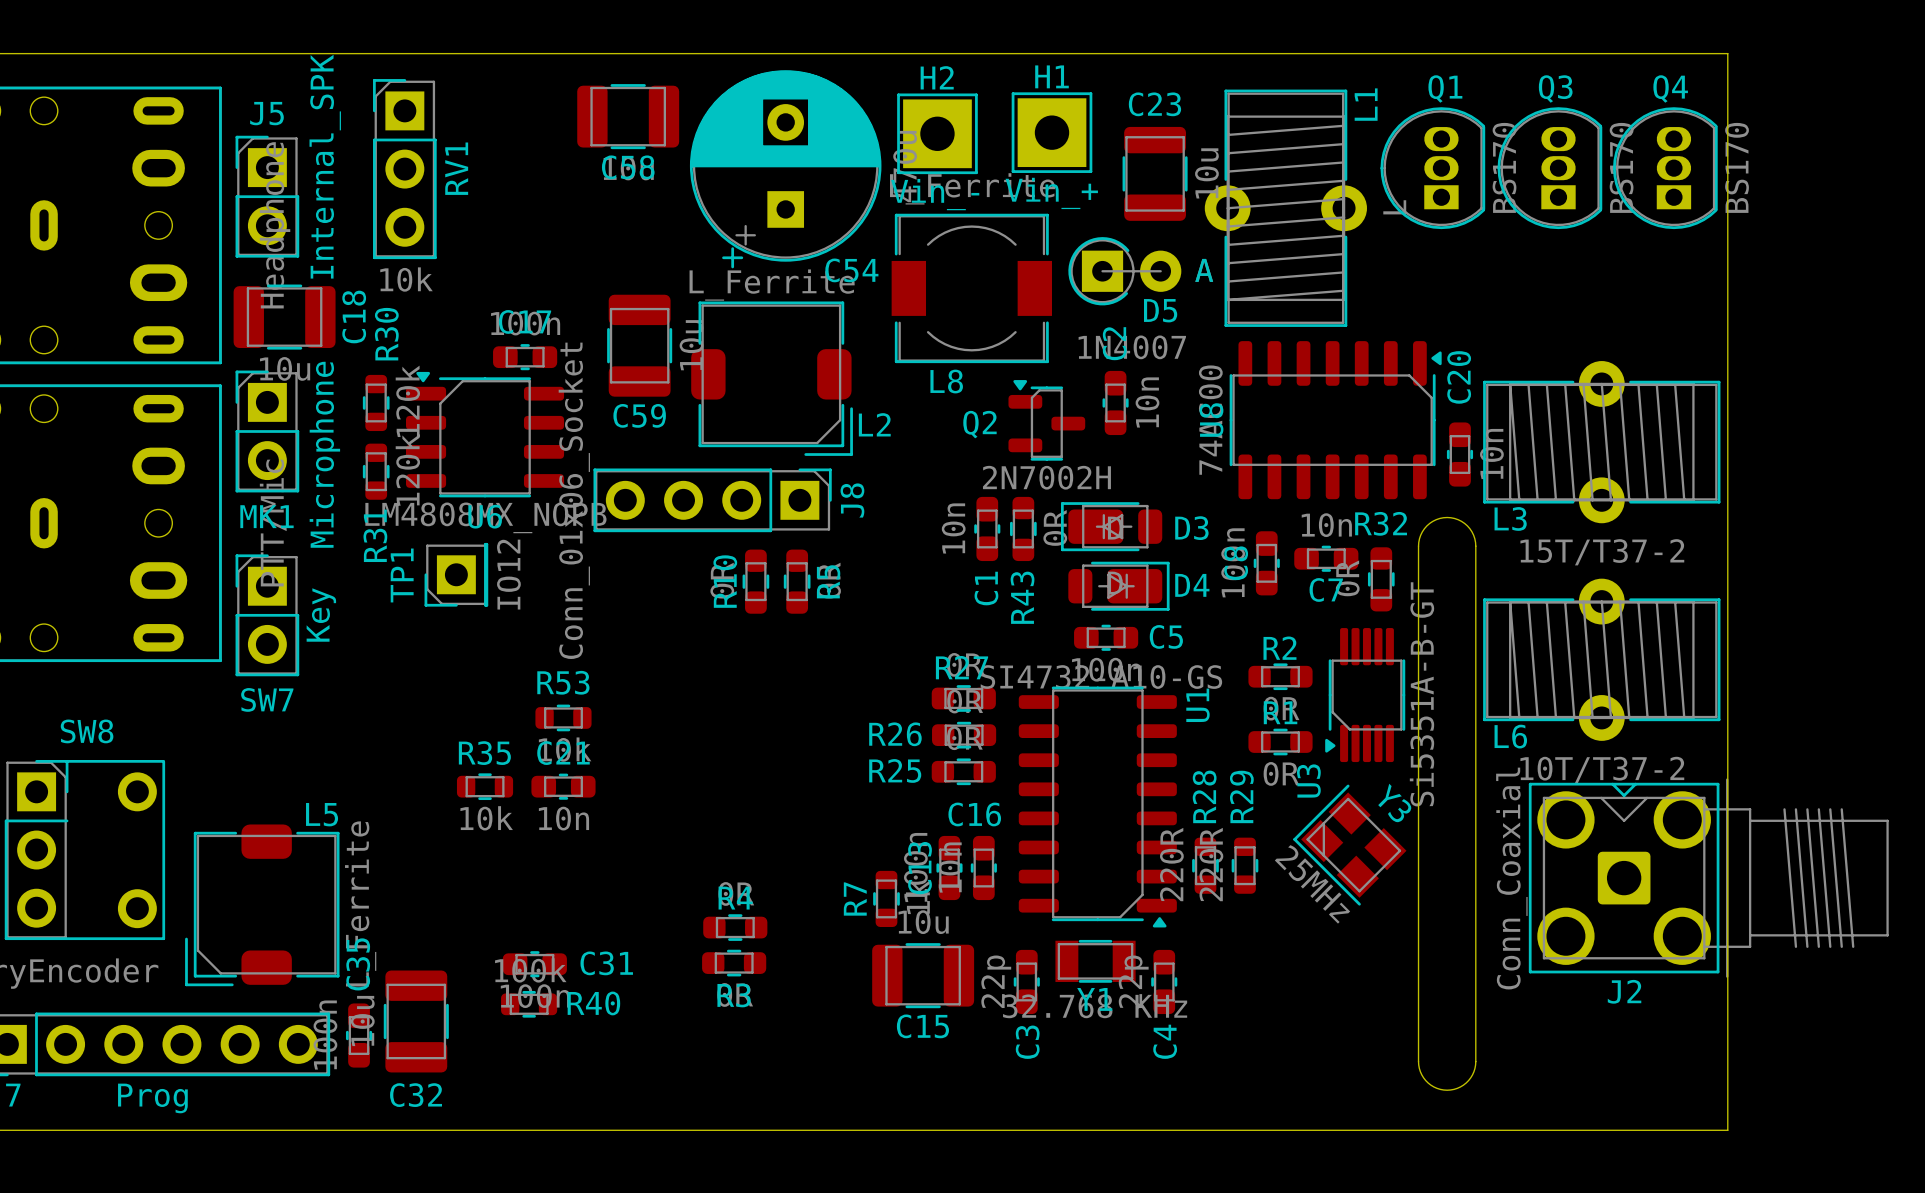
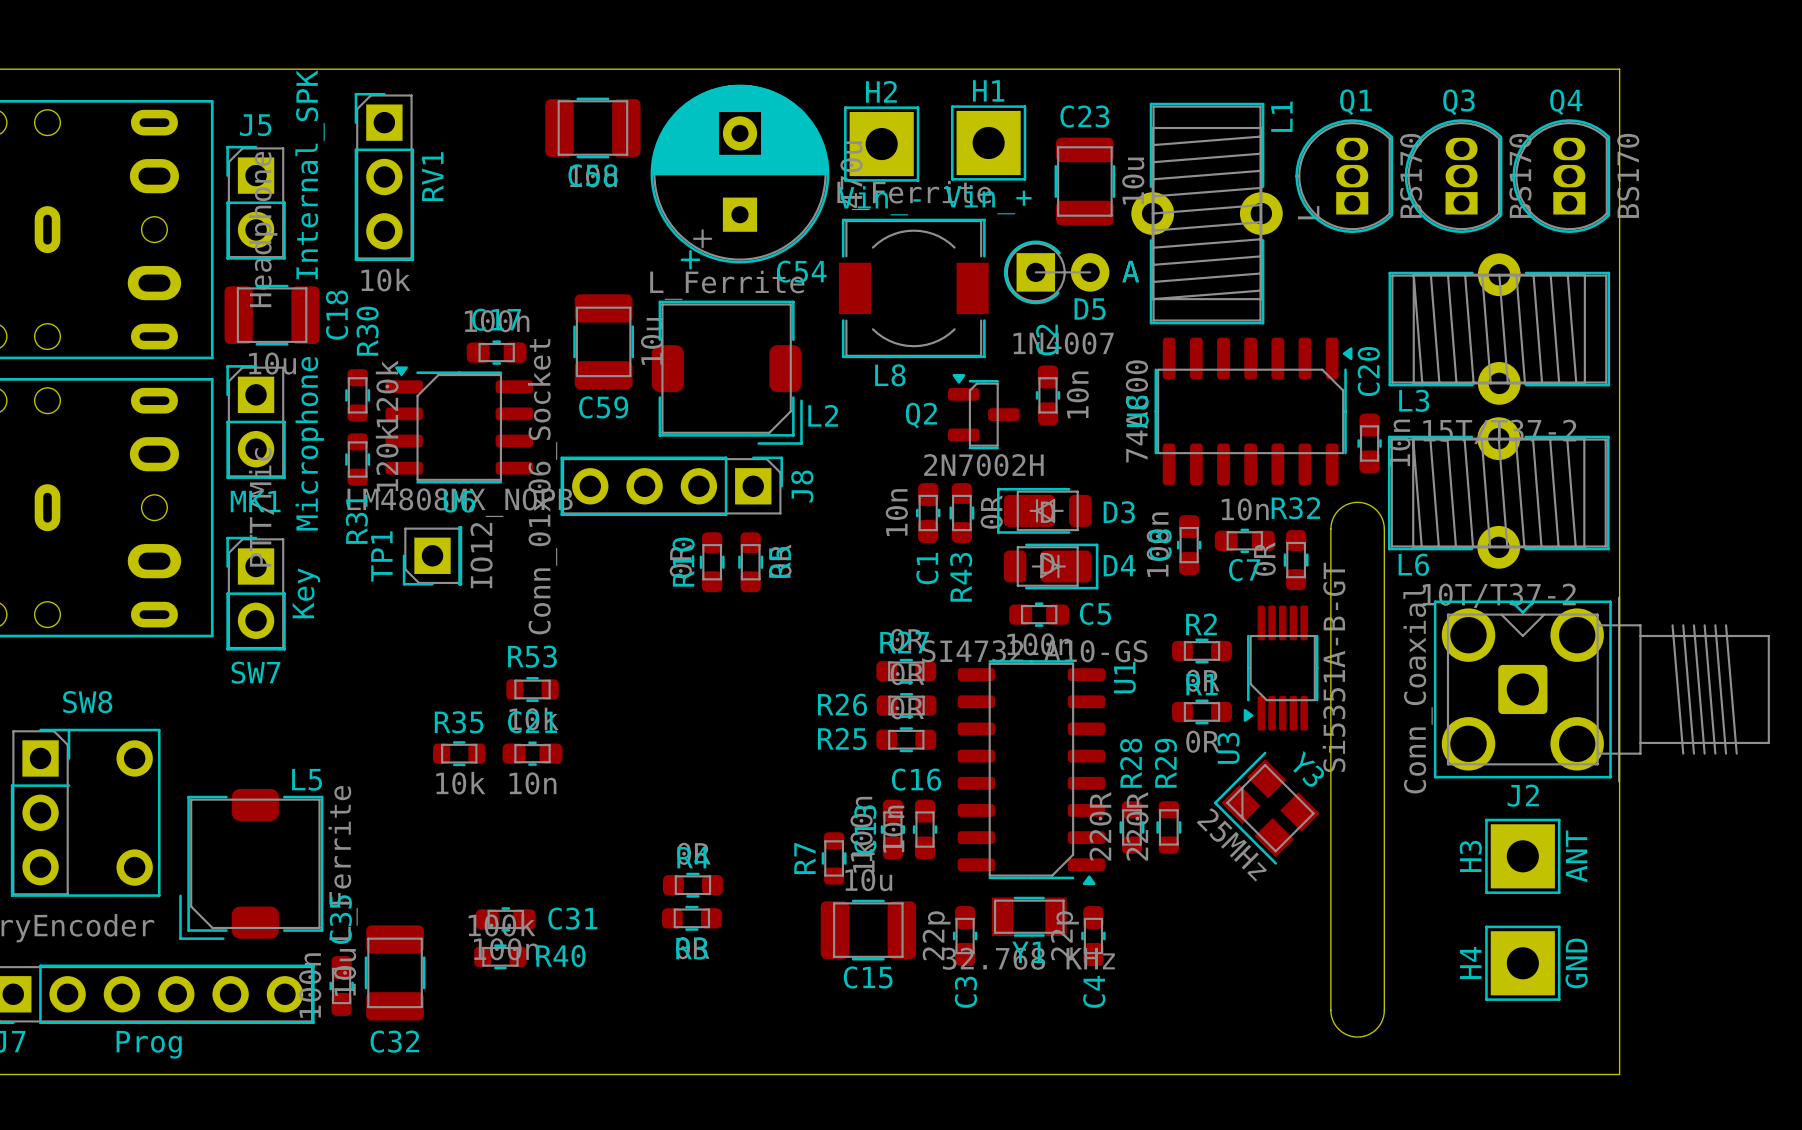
L3 position: (1601, 442) -> (1499, 329)
L6 position: (1601, 659) -> (1498, 493)
J2 position: (1708, 878) -> (1601, 689)
H3: none -> ANT (1522, 856)
H4: none -> GND (1522, 963)

